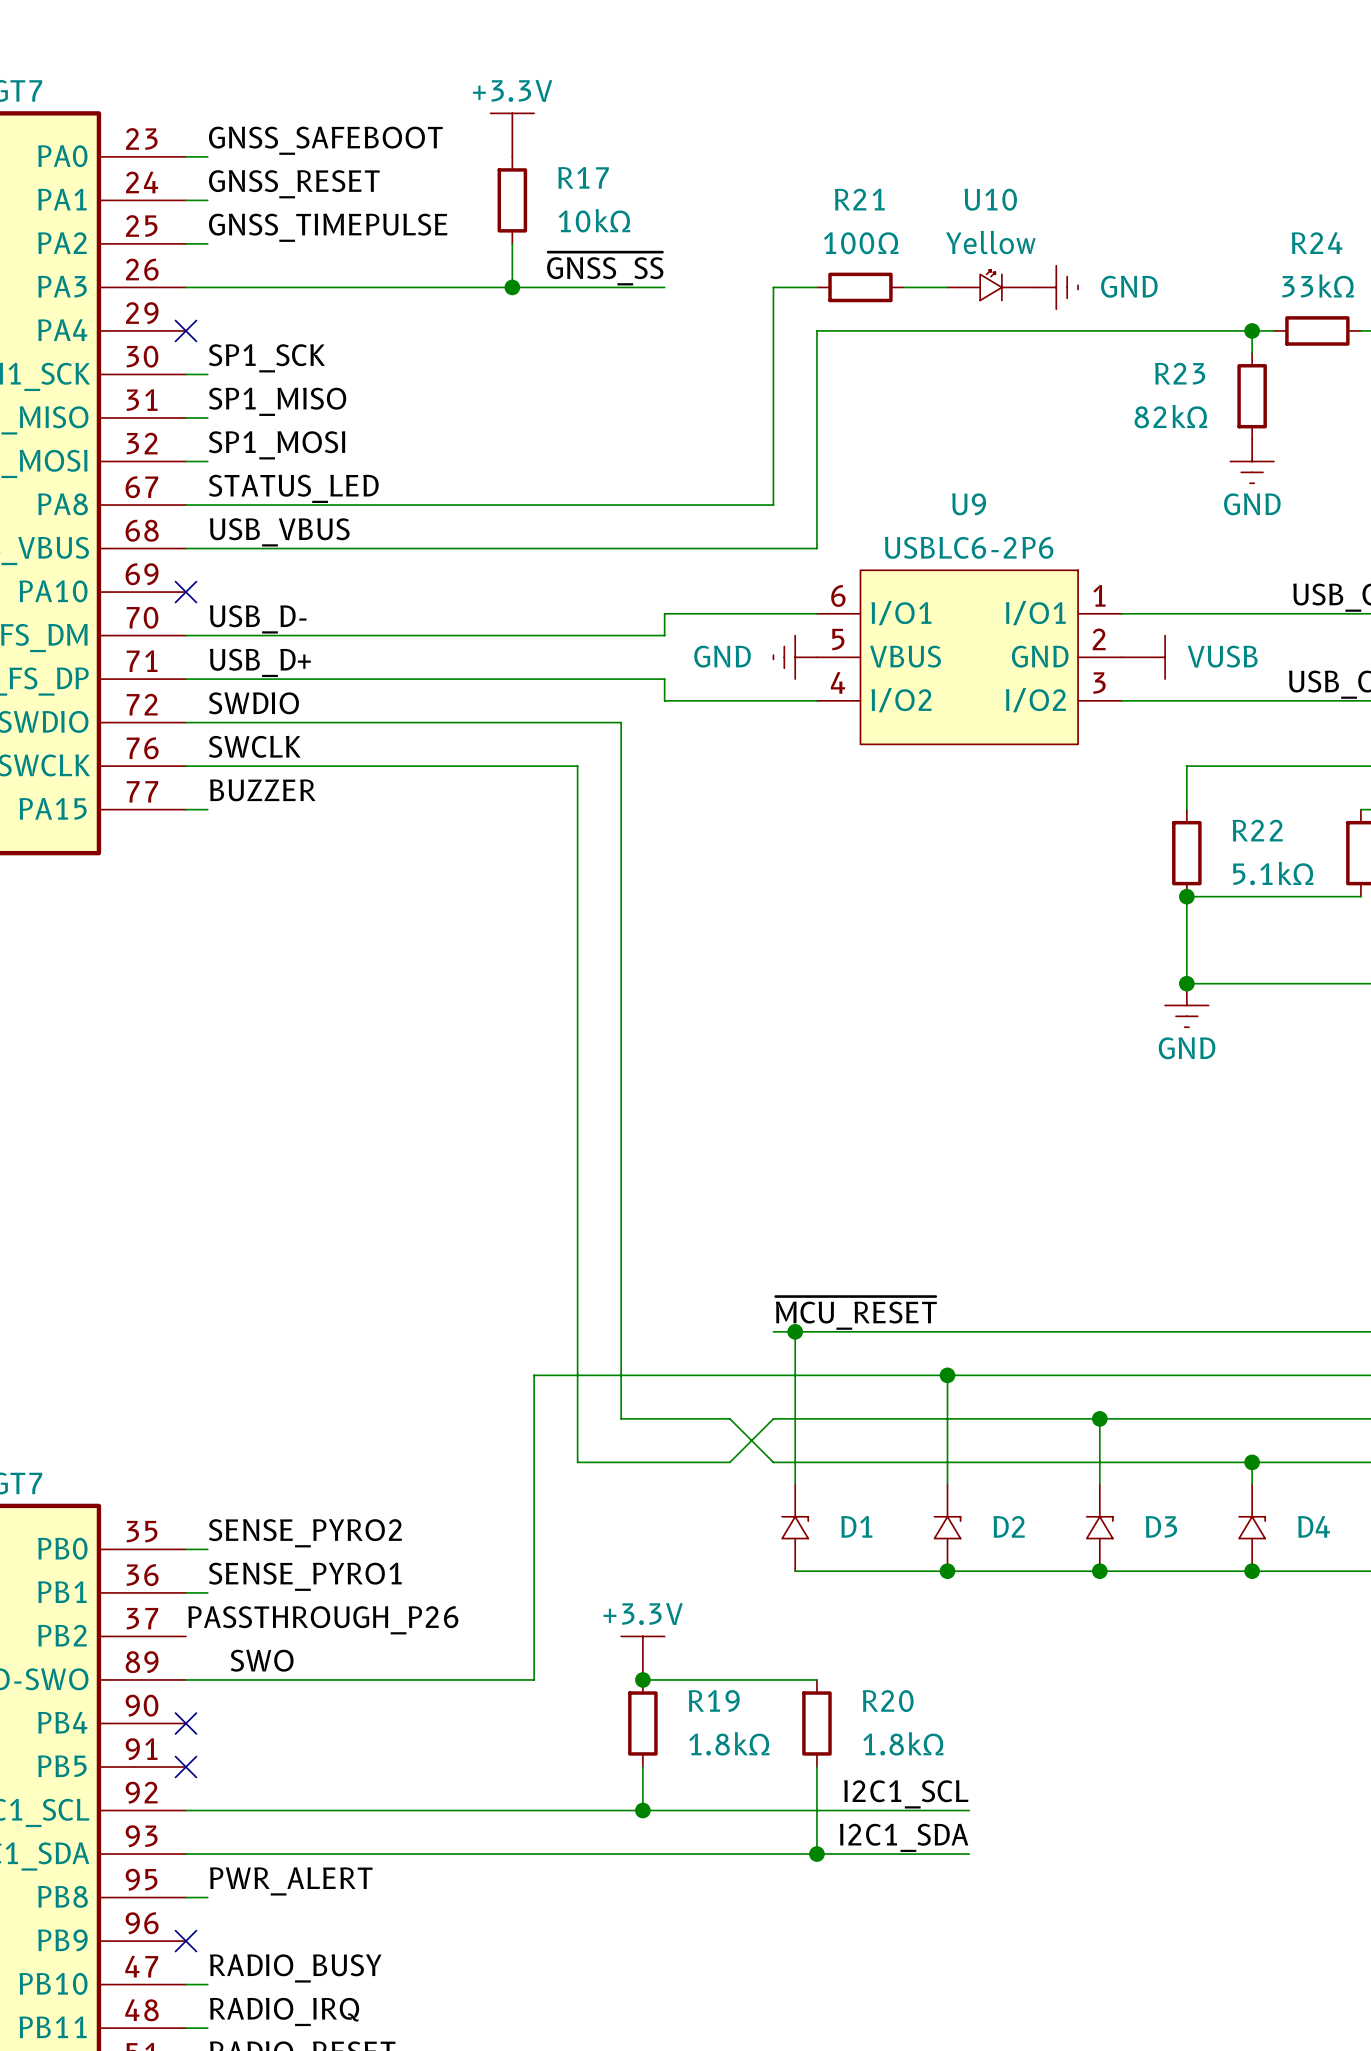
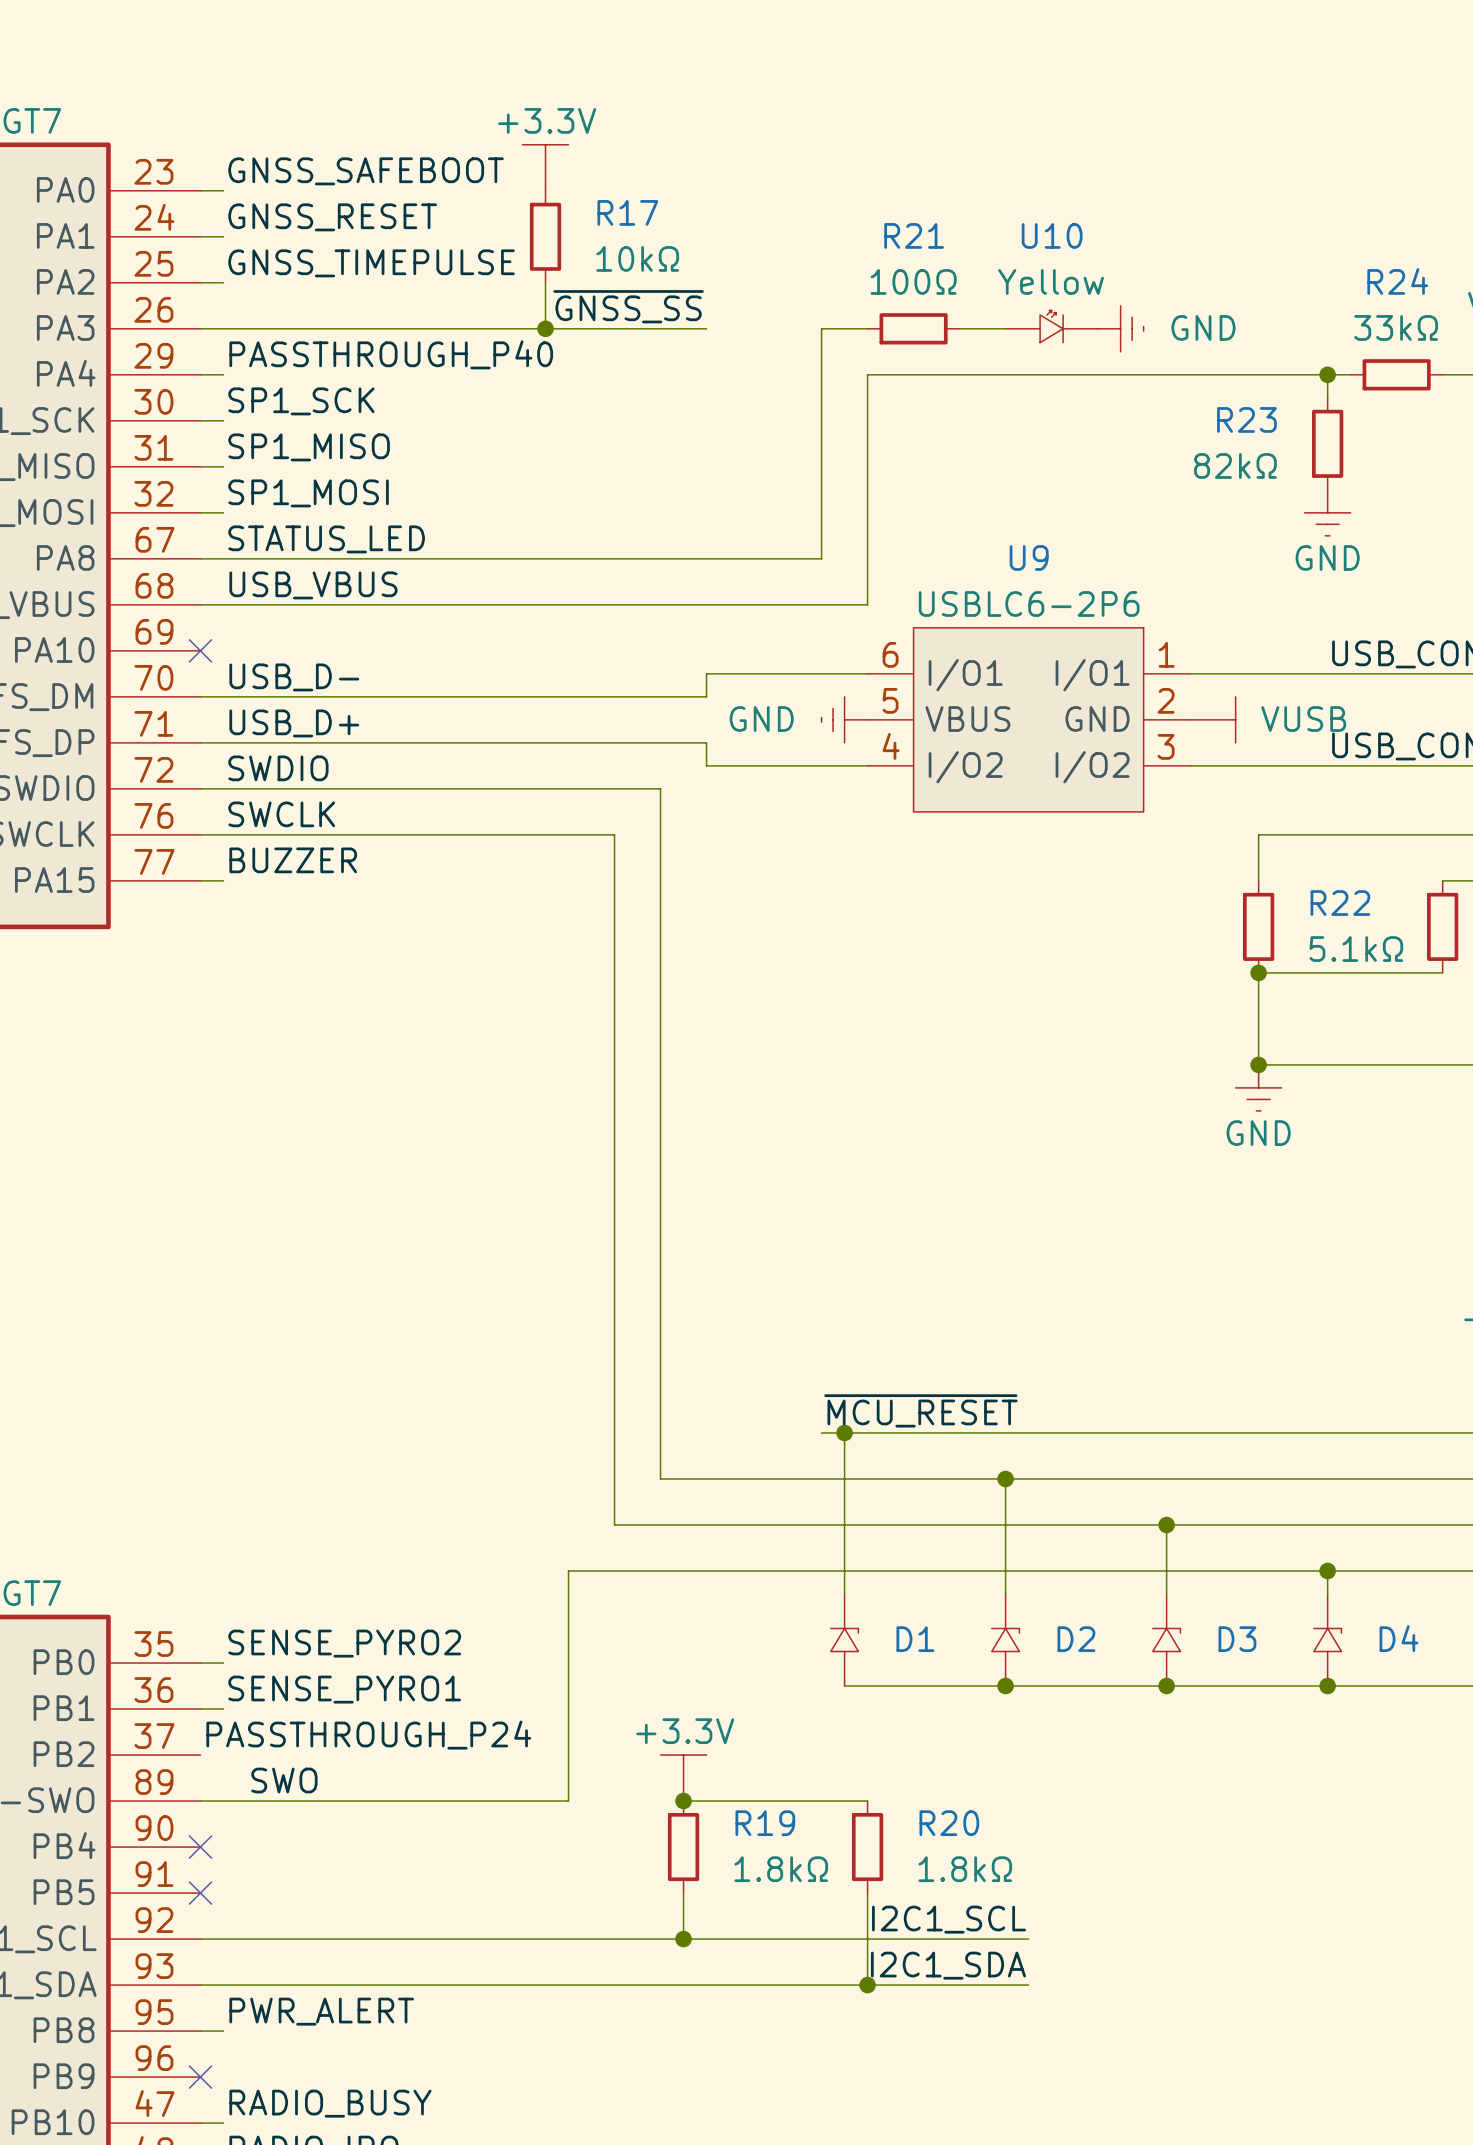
label: none -> PASSTHROUGH_P40 (391, 354)
wire: none -> (200, 374) (223, 374)
no-connect mark: (185, 330) -> none
wire: (577, 1418) (577, 1462) -> (614, 1524) (660, 1524)
wire: (621, 1418) (621, 1375) (534, 1375) (534, 1462) -> (614, 1571) (568, 1571)
wire: (729, 1418) (773, 1462) -> (775, 1524) (821, 1524)
wire: (773, 1418) (729, 1462) -> (821, 1571) (775, 1571)
label: PASSTHROUGH_P26 (323, 1620) -> PASSTHROUGH_P24 (368, 1735)

